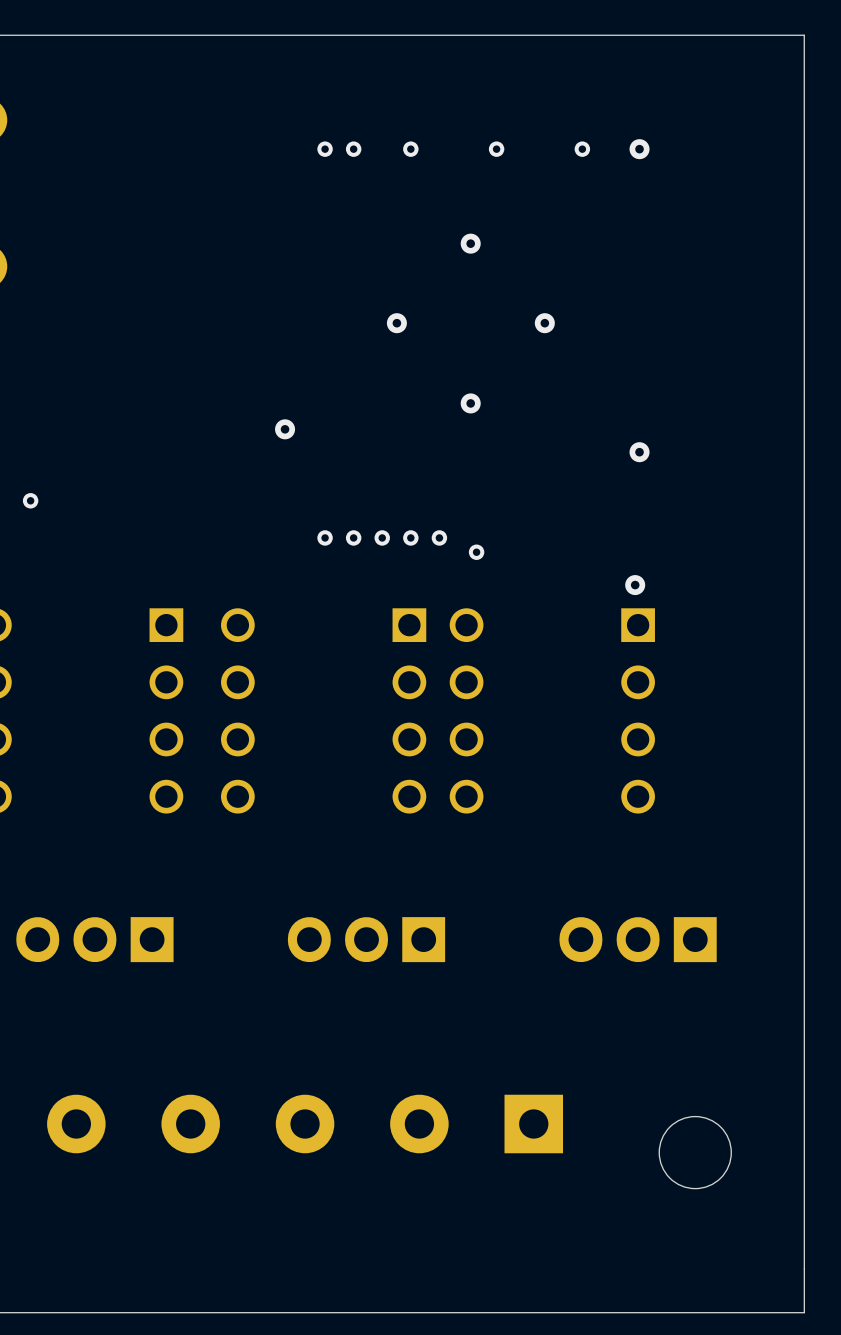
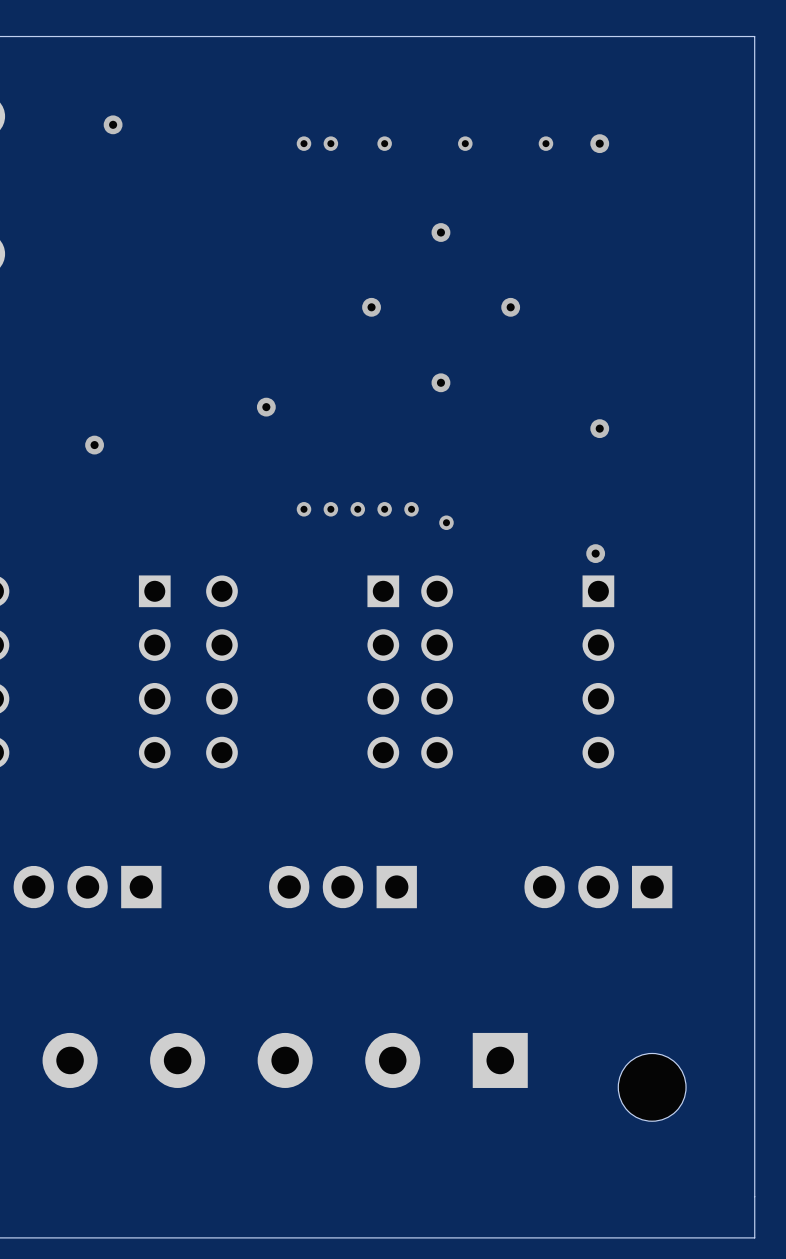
via: none -> (113, 124)
via: none -> (94, 445)
via: (30, 500) -> none

